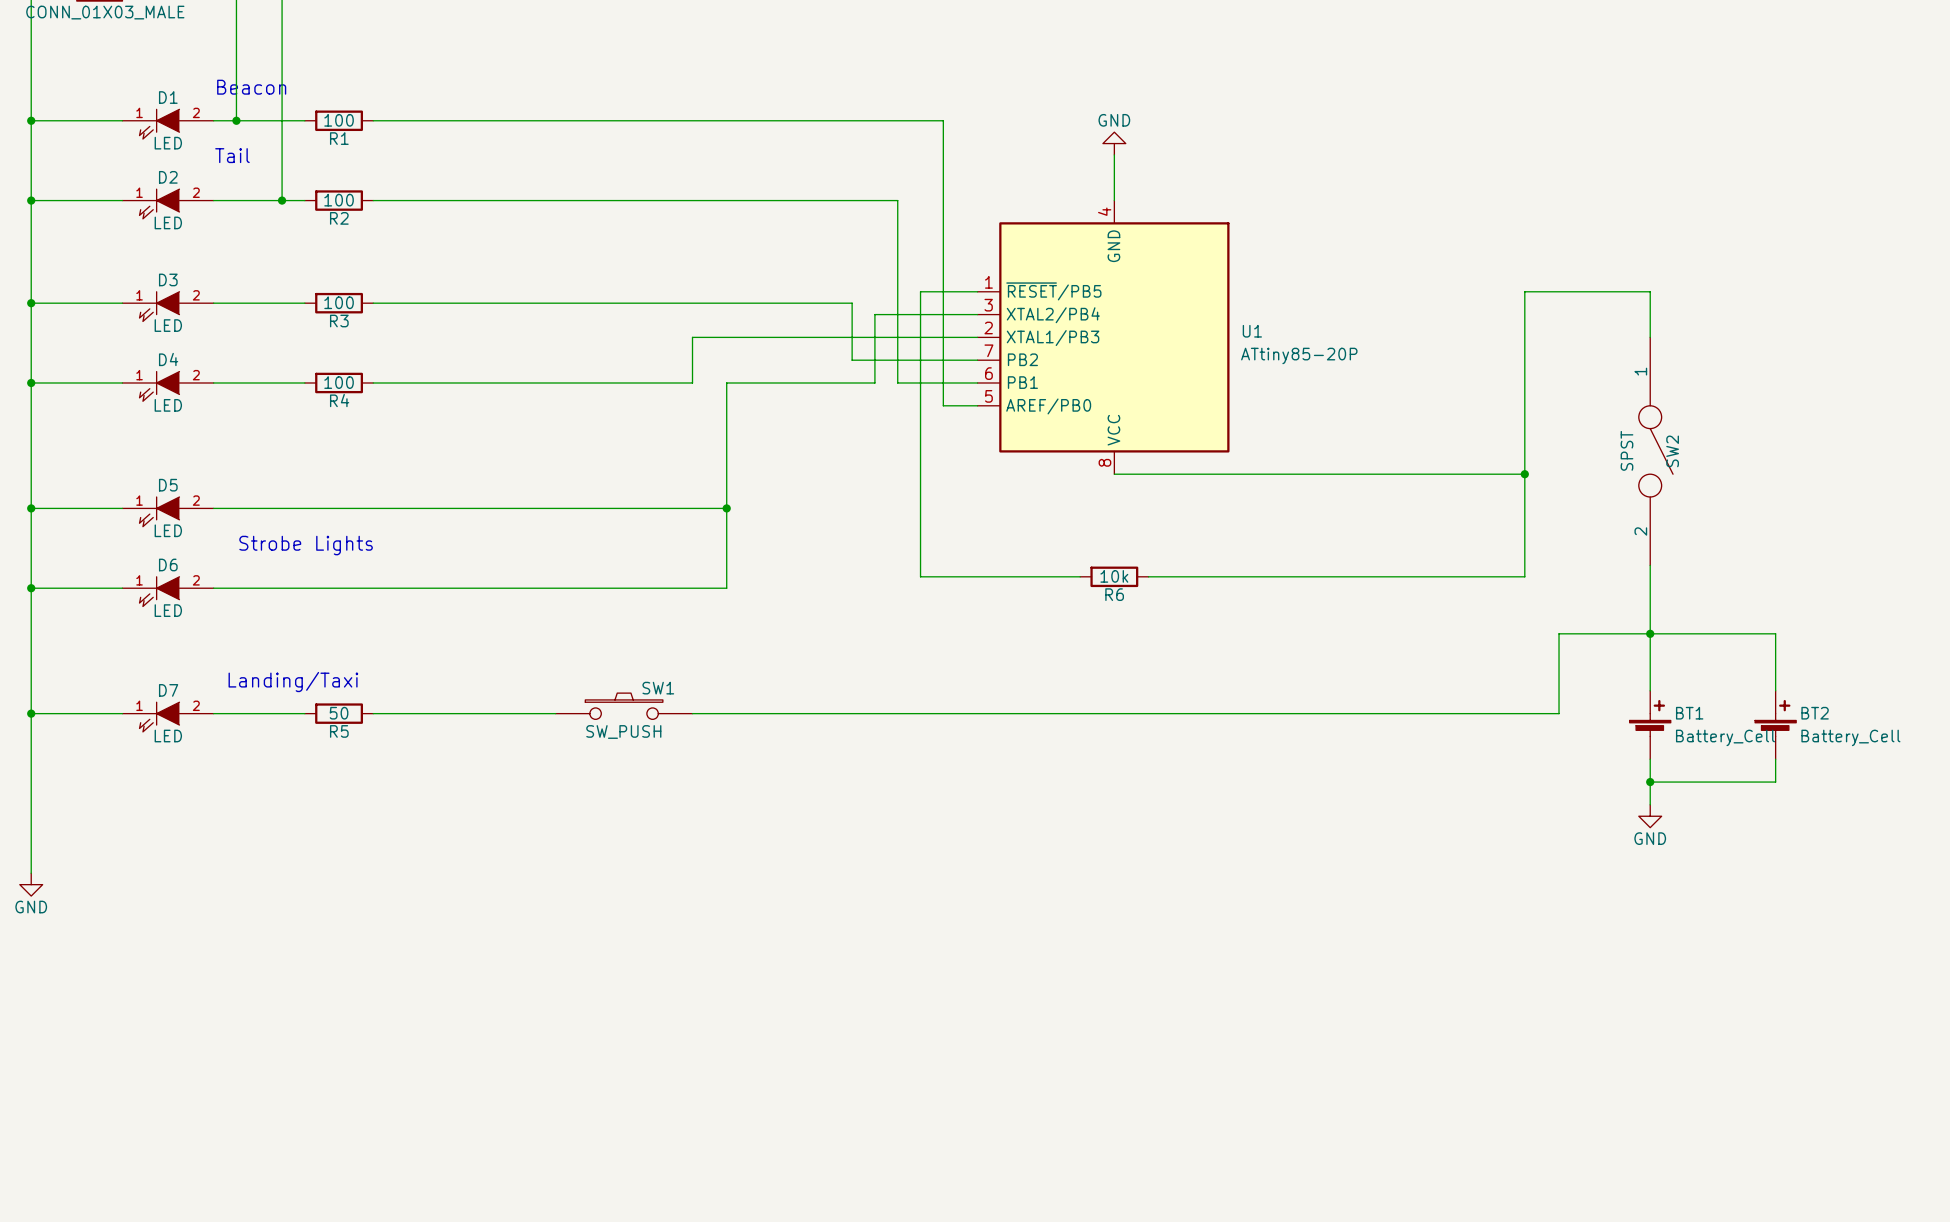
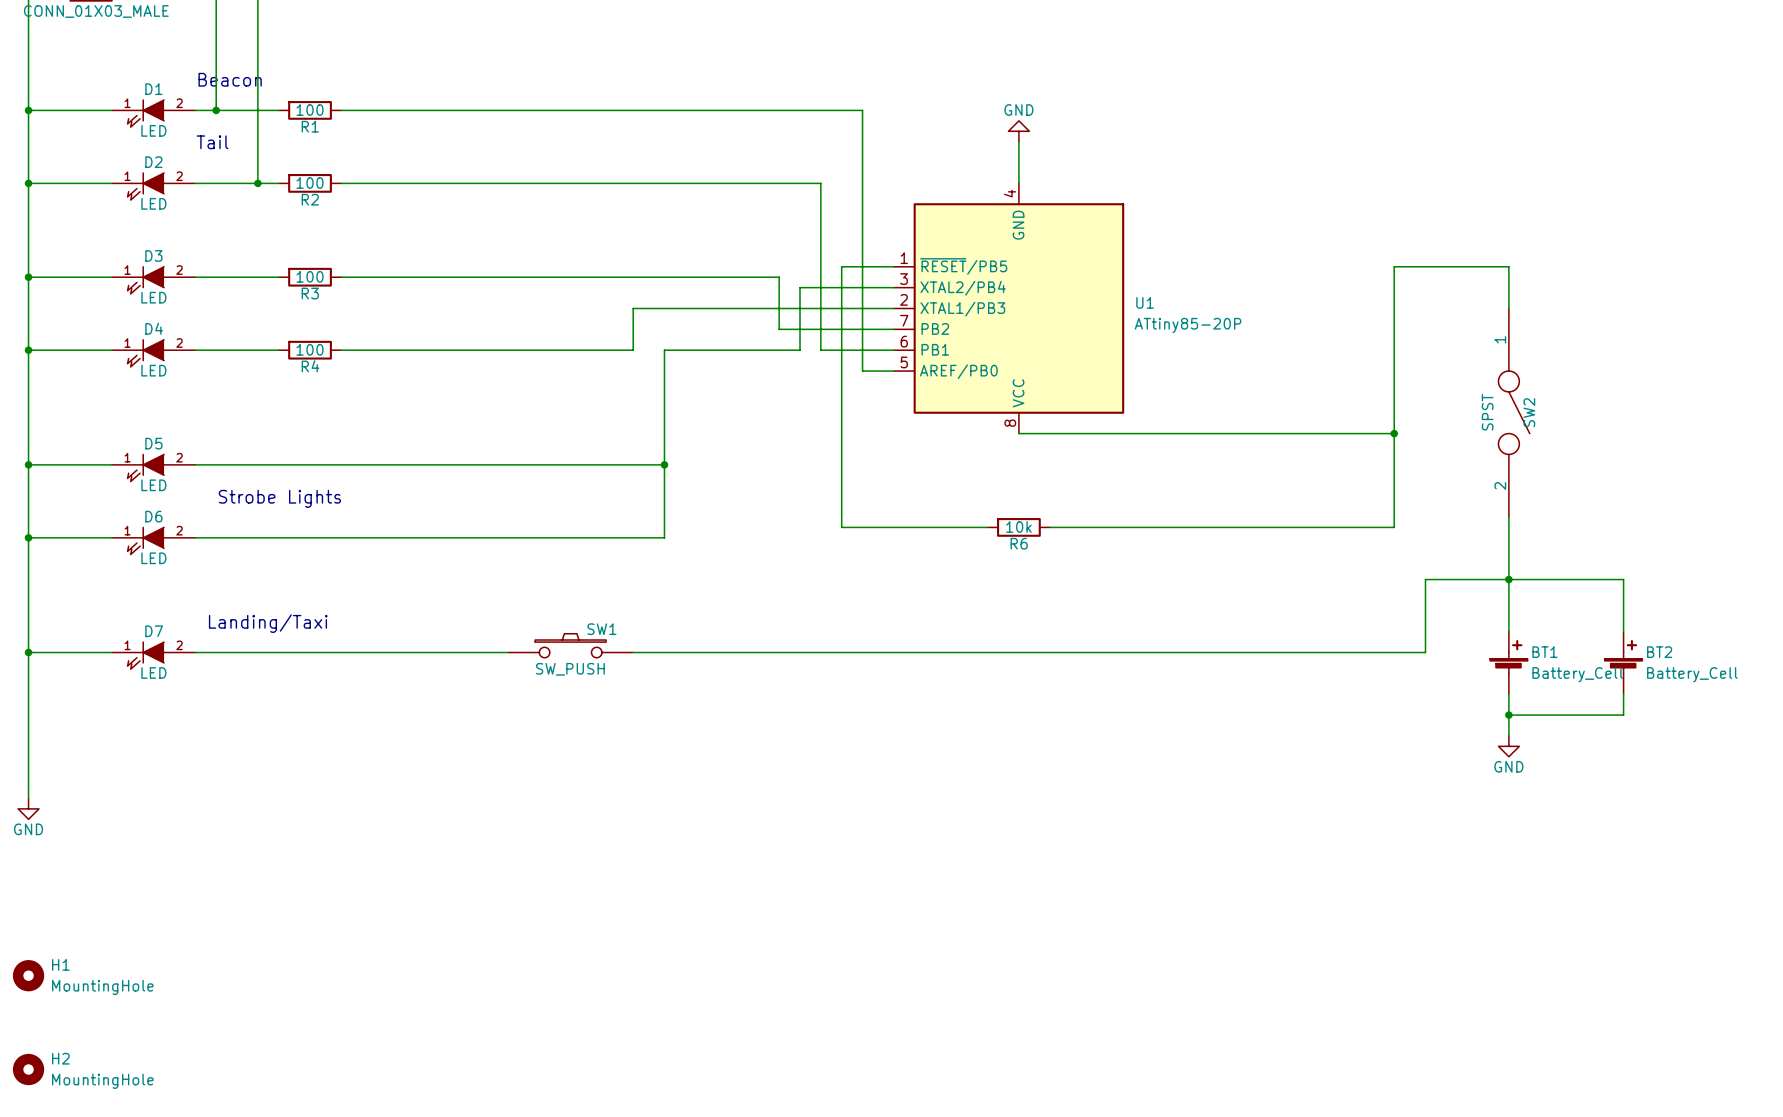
wire: none -> (278, 652) (341, 652)
R5: 50 (339, 713) -> none
H1: none -> MountingHole (28, 975)
H2: none -> MountingHole (28, 1069)

